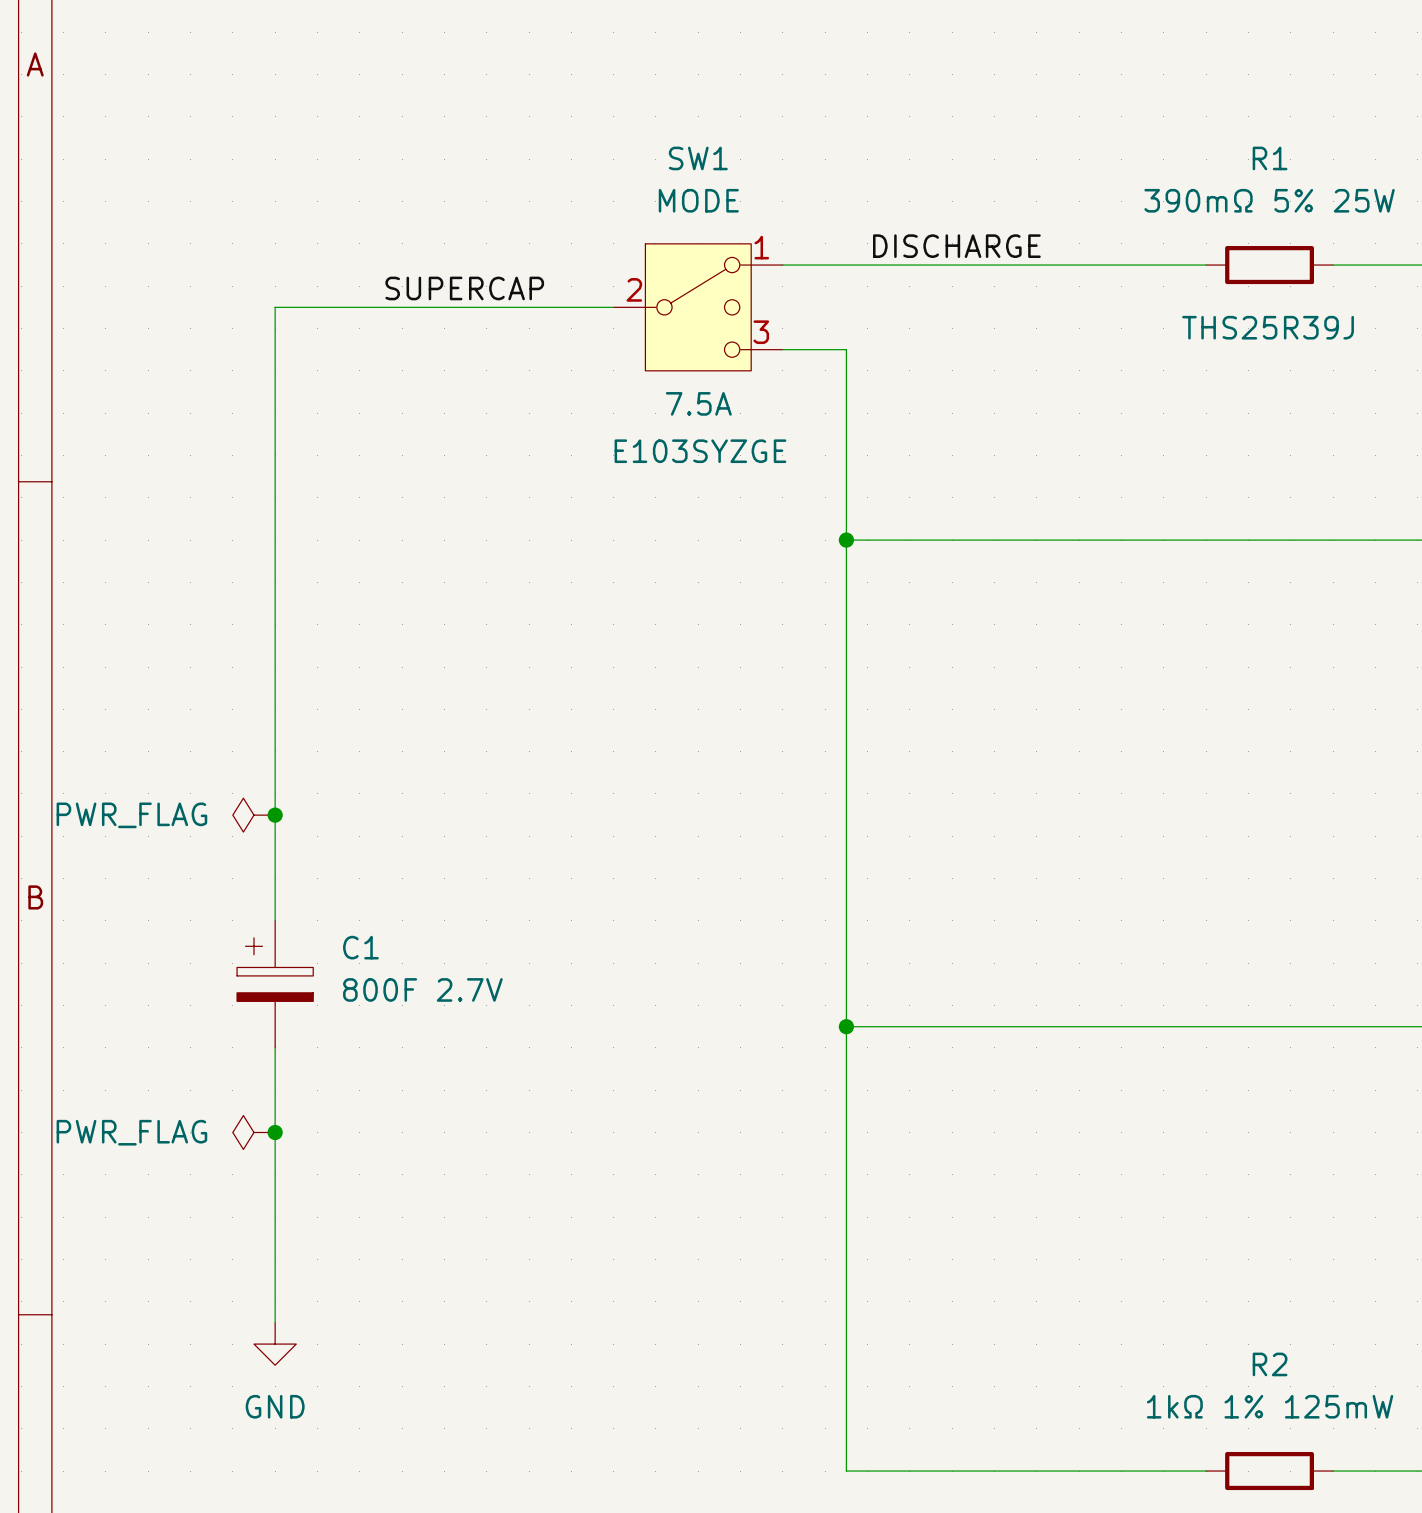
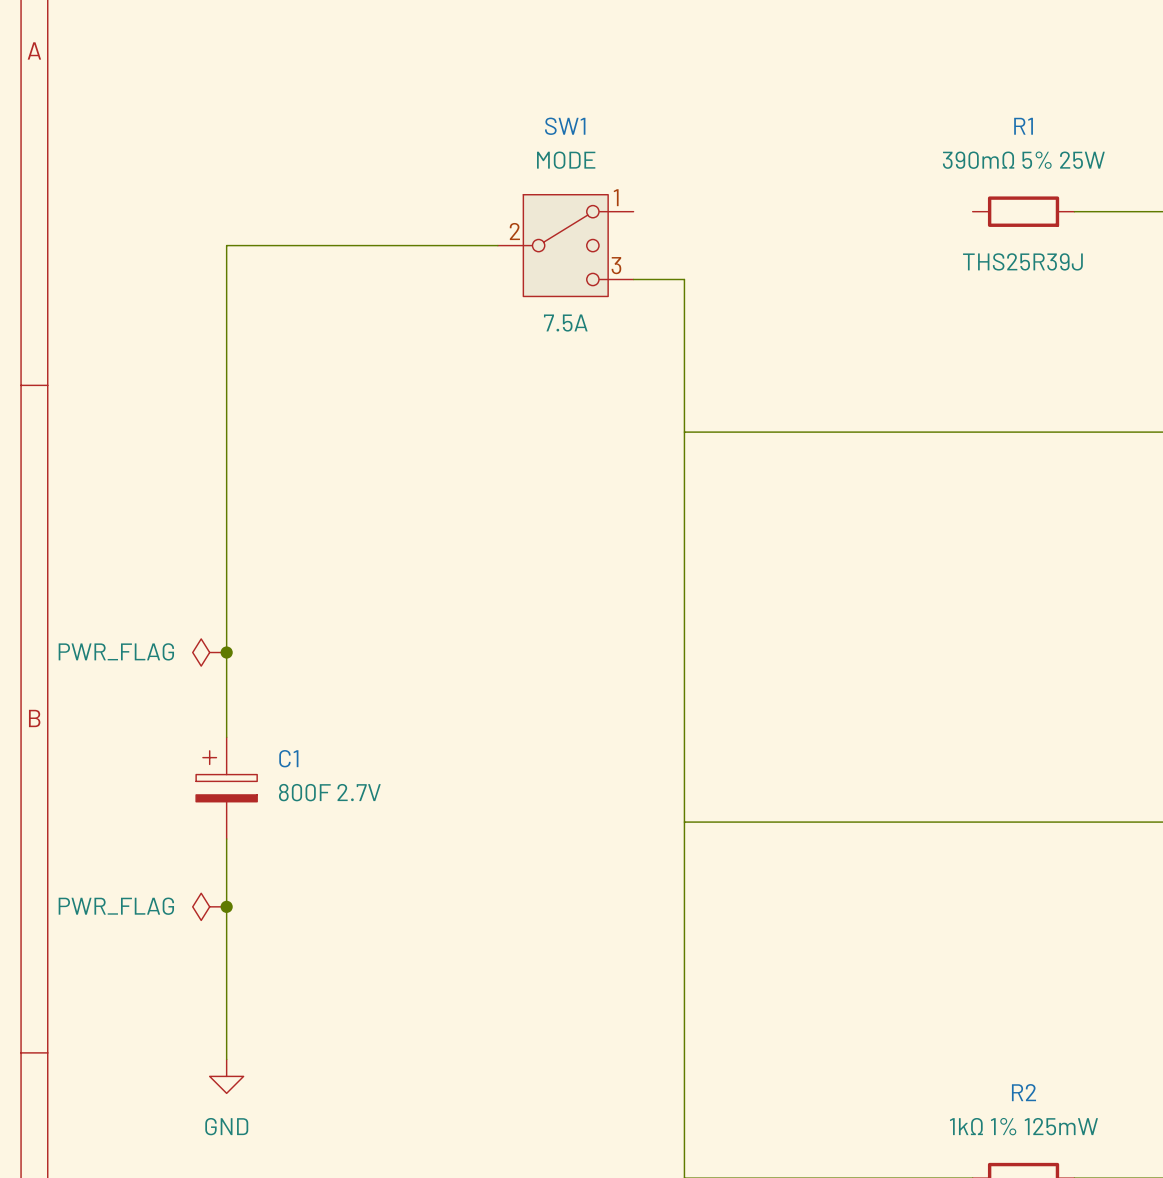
label: DISCHARGE (956, 246) -> none
wire: (782, 265) (1206, 265) -> none
label: SUPERCAP (464, 288) -> none
SW1 text: E103SYZGE (700, 451) -> none
junction: (846, 540) -> none
junction: (846, 1026) -> none

